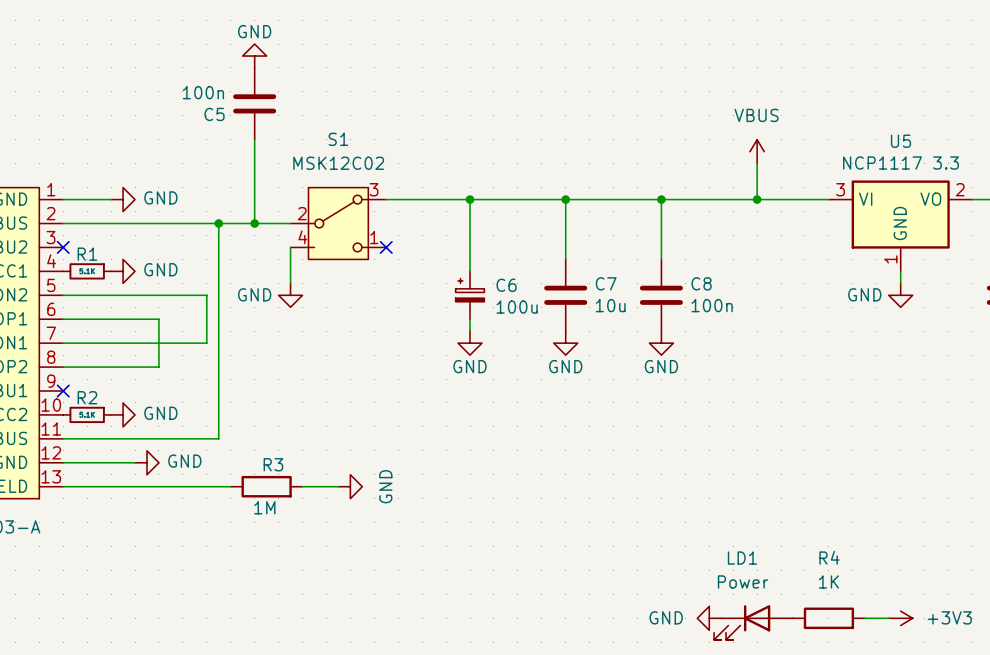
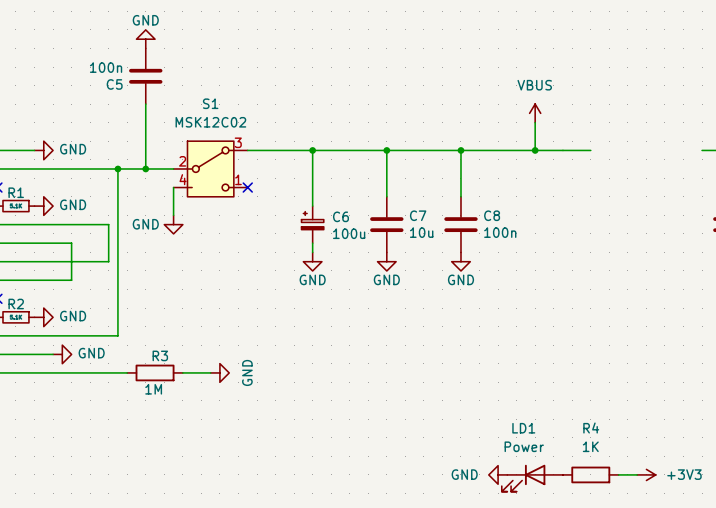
U5: NCP1117 3.3 (900, 225) -> none
wire: (900, 271) (900, 283) -> none
power symbol: GND (900, 295) -> none

